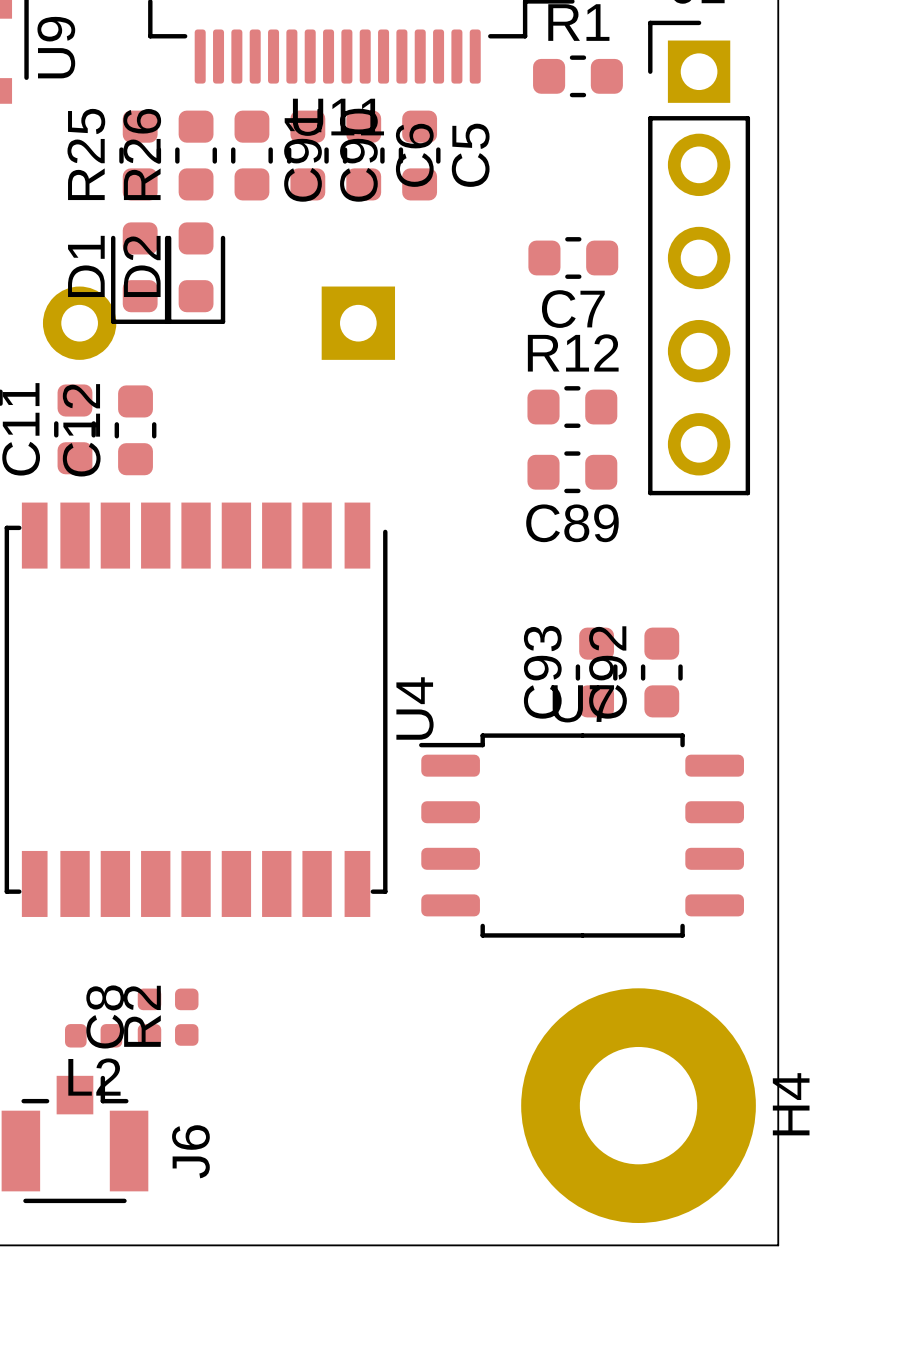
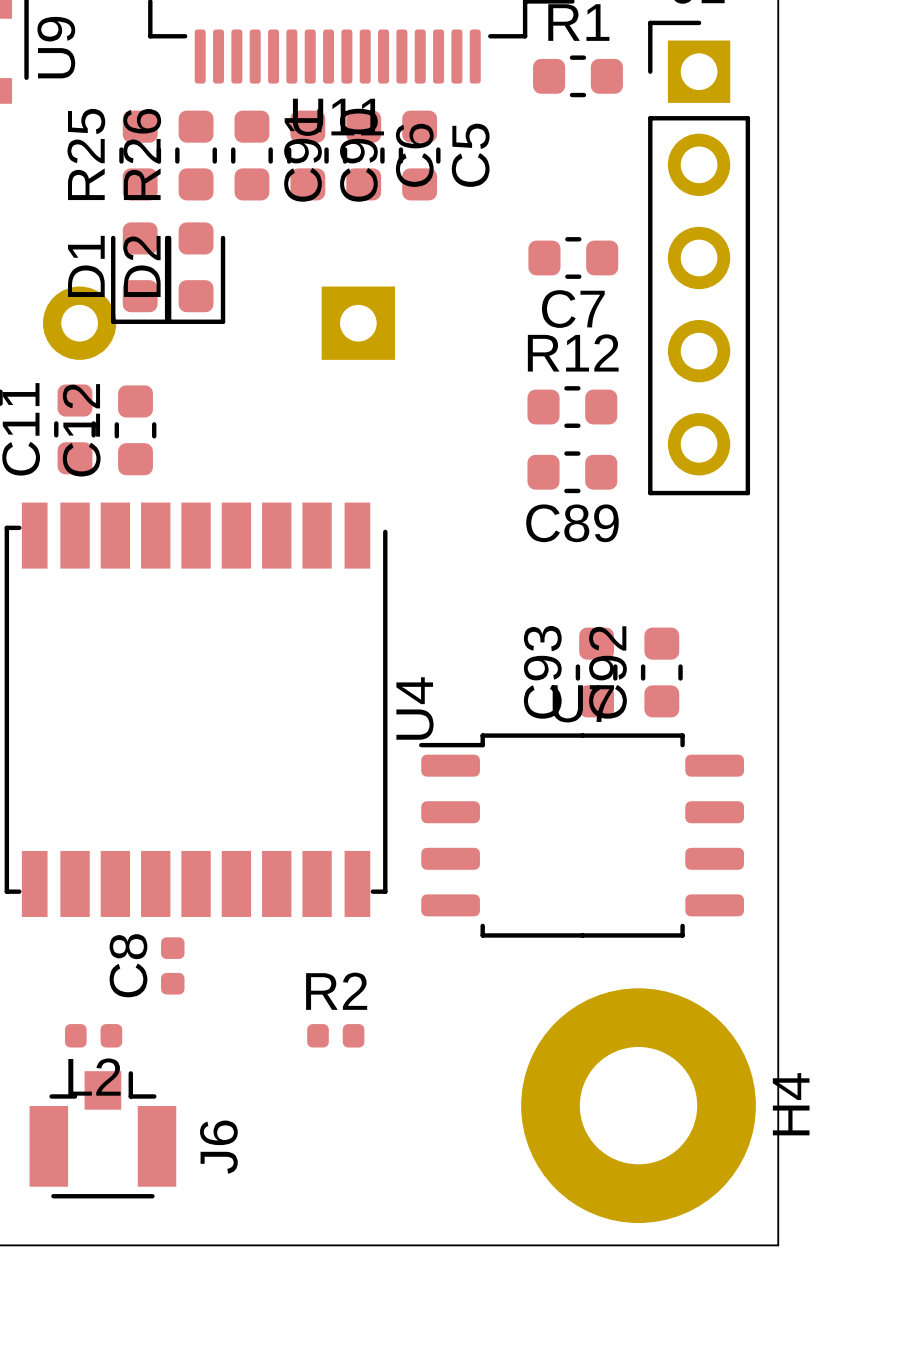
C8 position: (149, 1017) -> (172, 965)
R2 rotation: 0° (186, 1017) -> 90° clockwise (335, 1035)
R2 position: (186, 1017) -> (335, 1035)
J6 position: (74, 1139) -> (102, 1134)

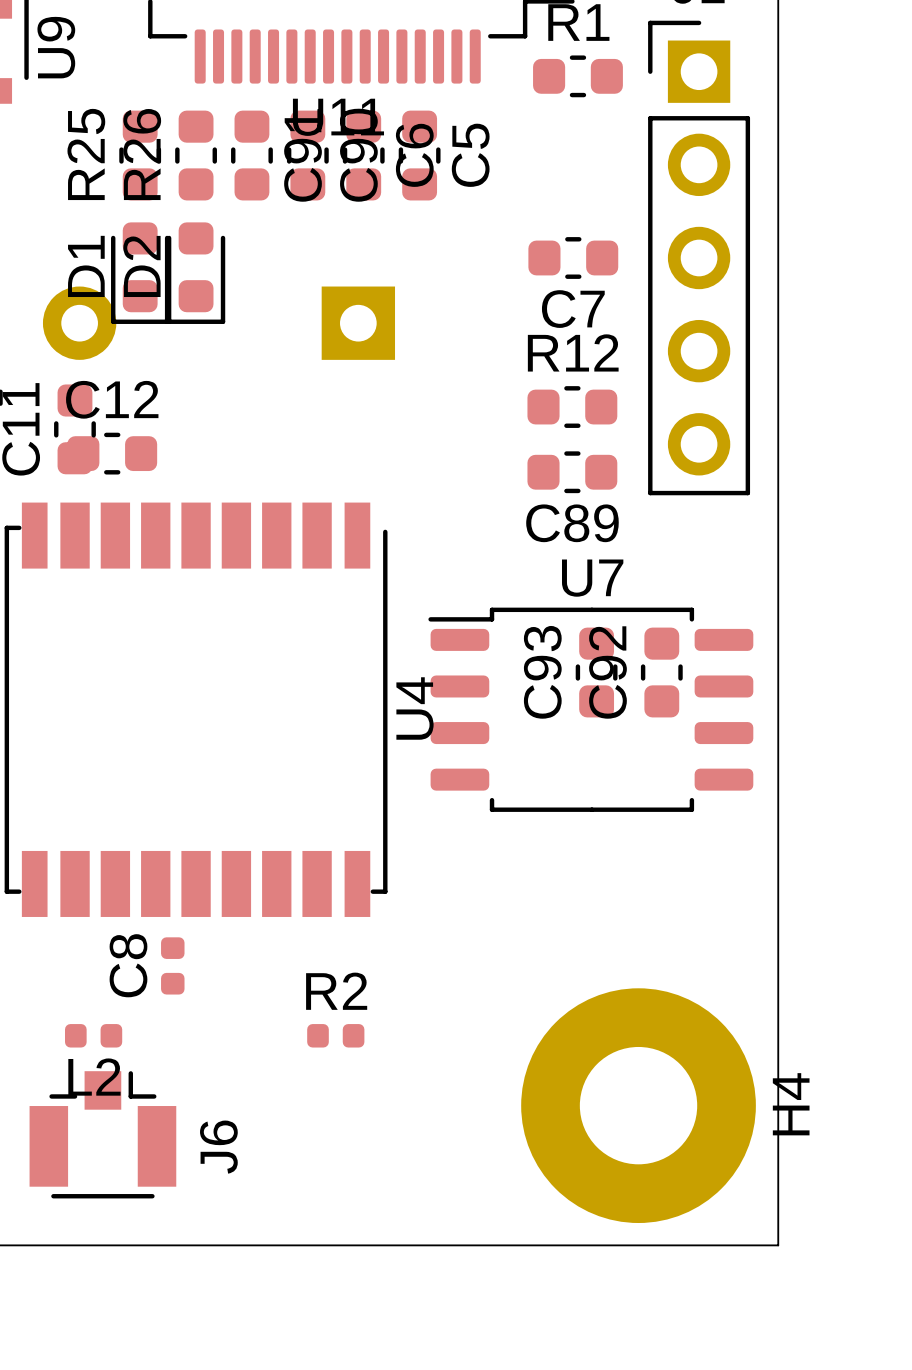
C12 rotation: 0° (135, 430) -> 90° clockwise (112, 453)
U7 position: (581, 835) -> (590, 709)

